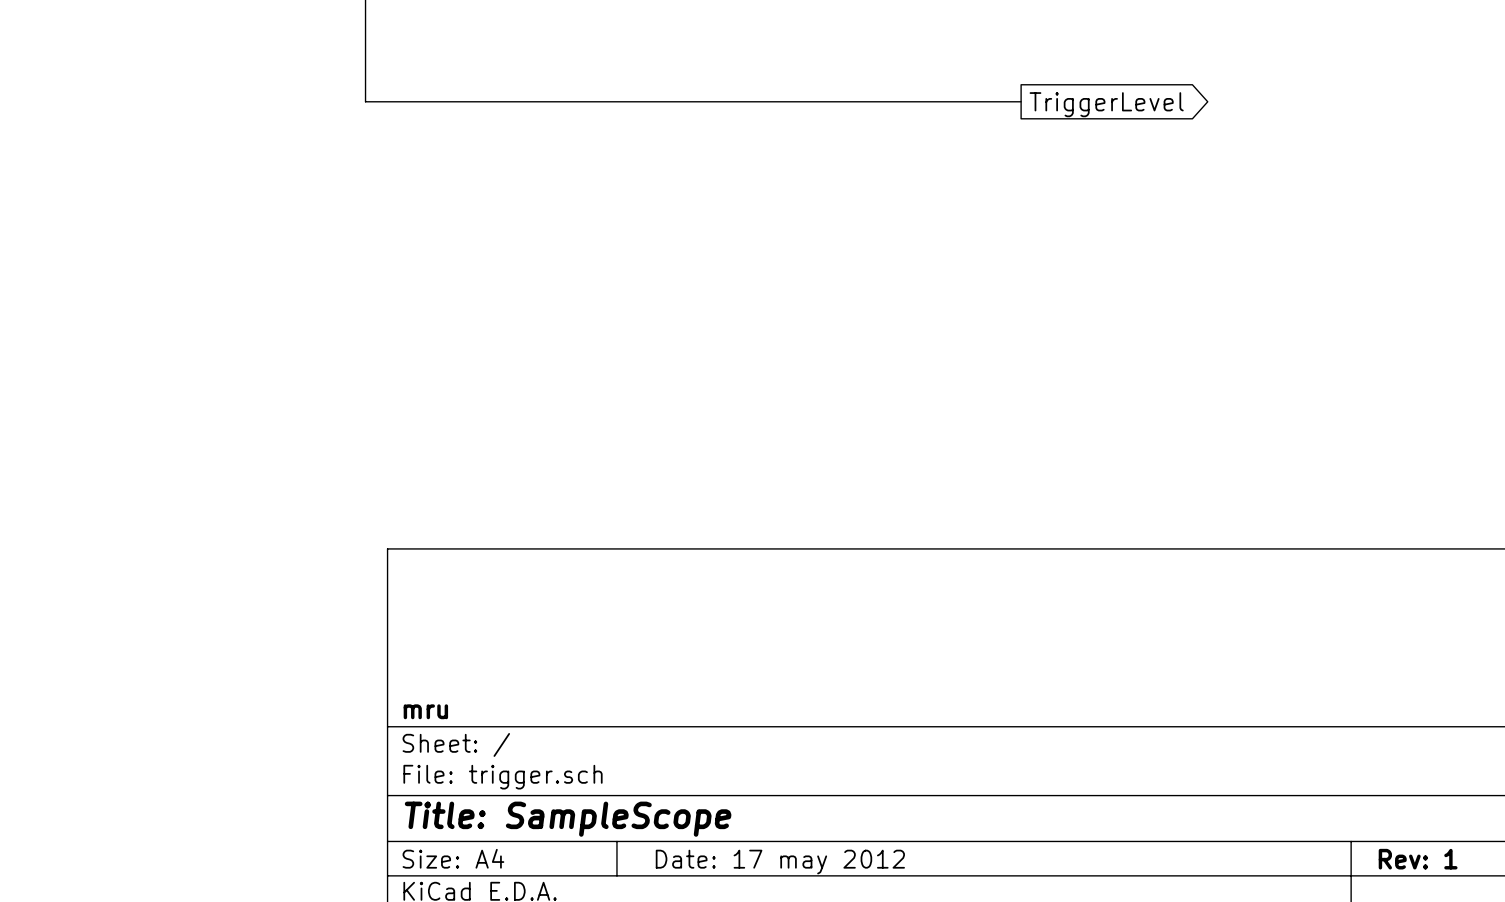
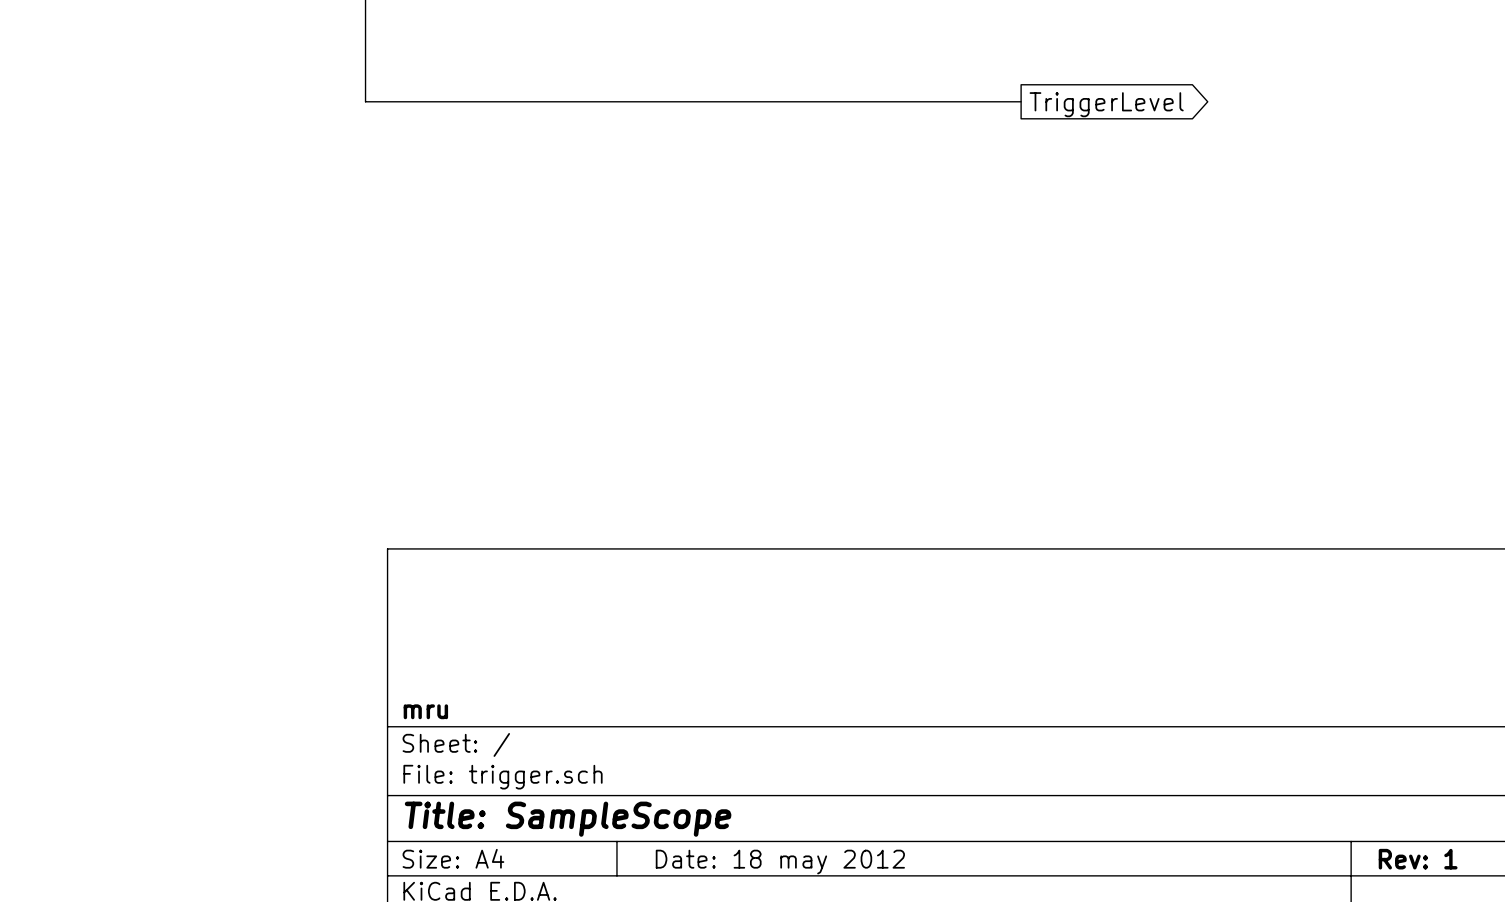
title block: Date: 17 may 2012 (780, 862) -> Date: 18 may 2012 (780, 862)

